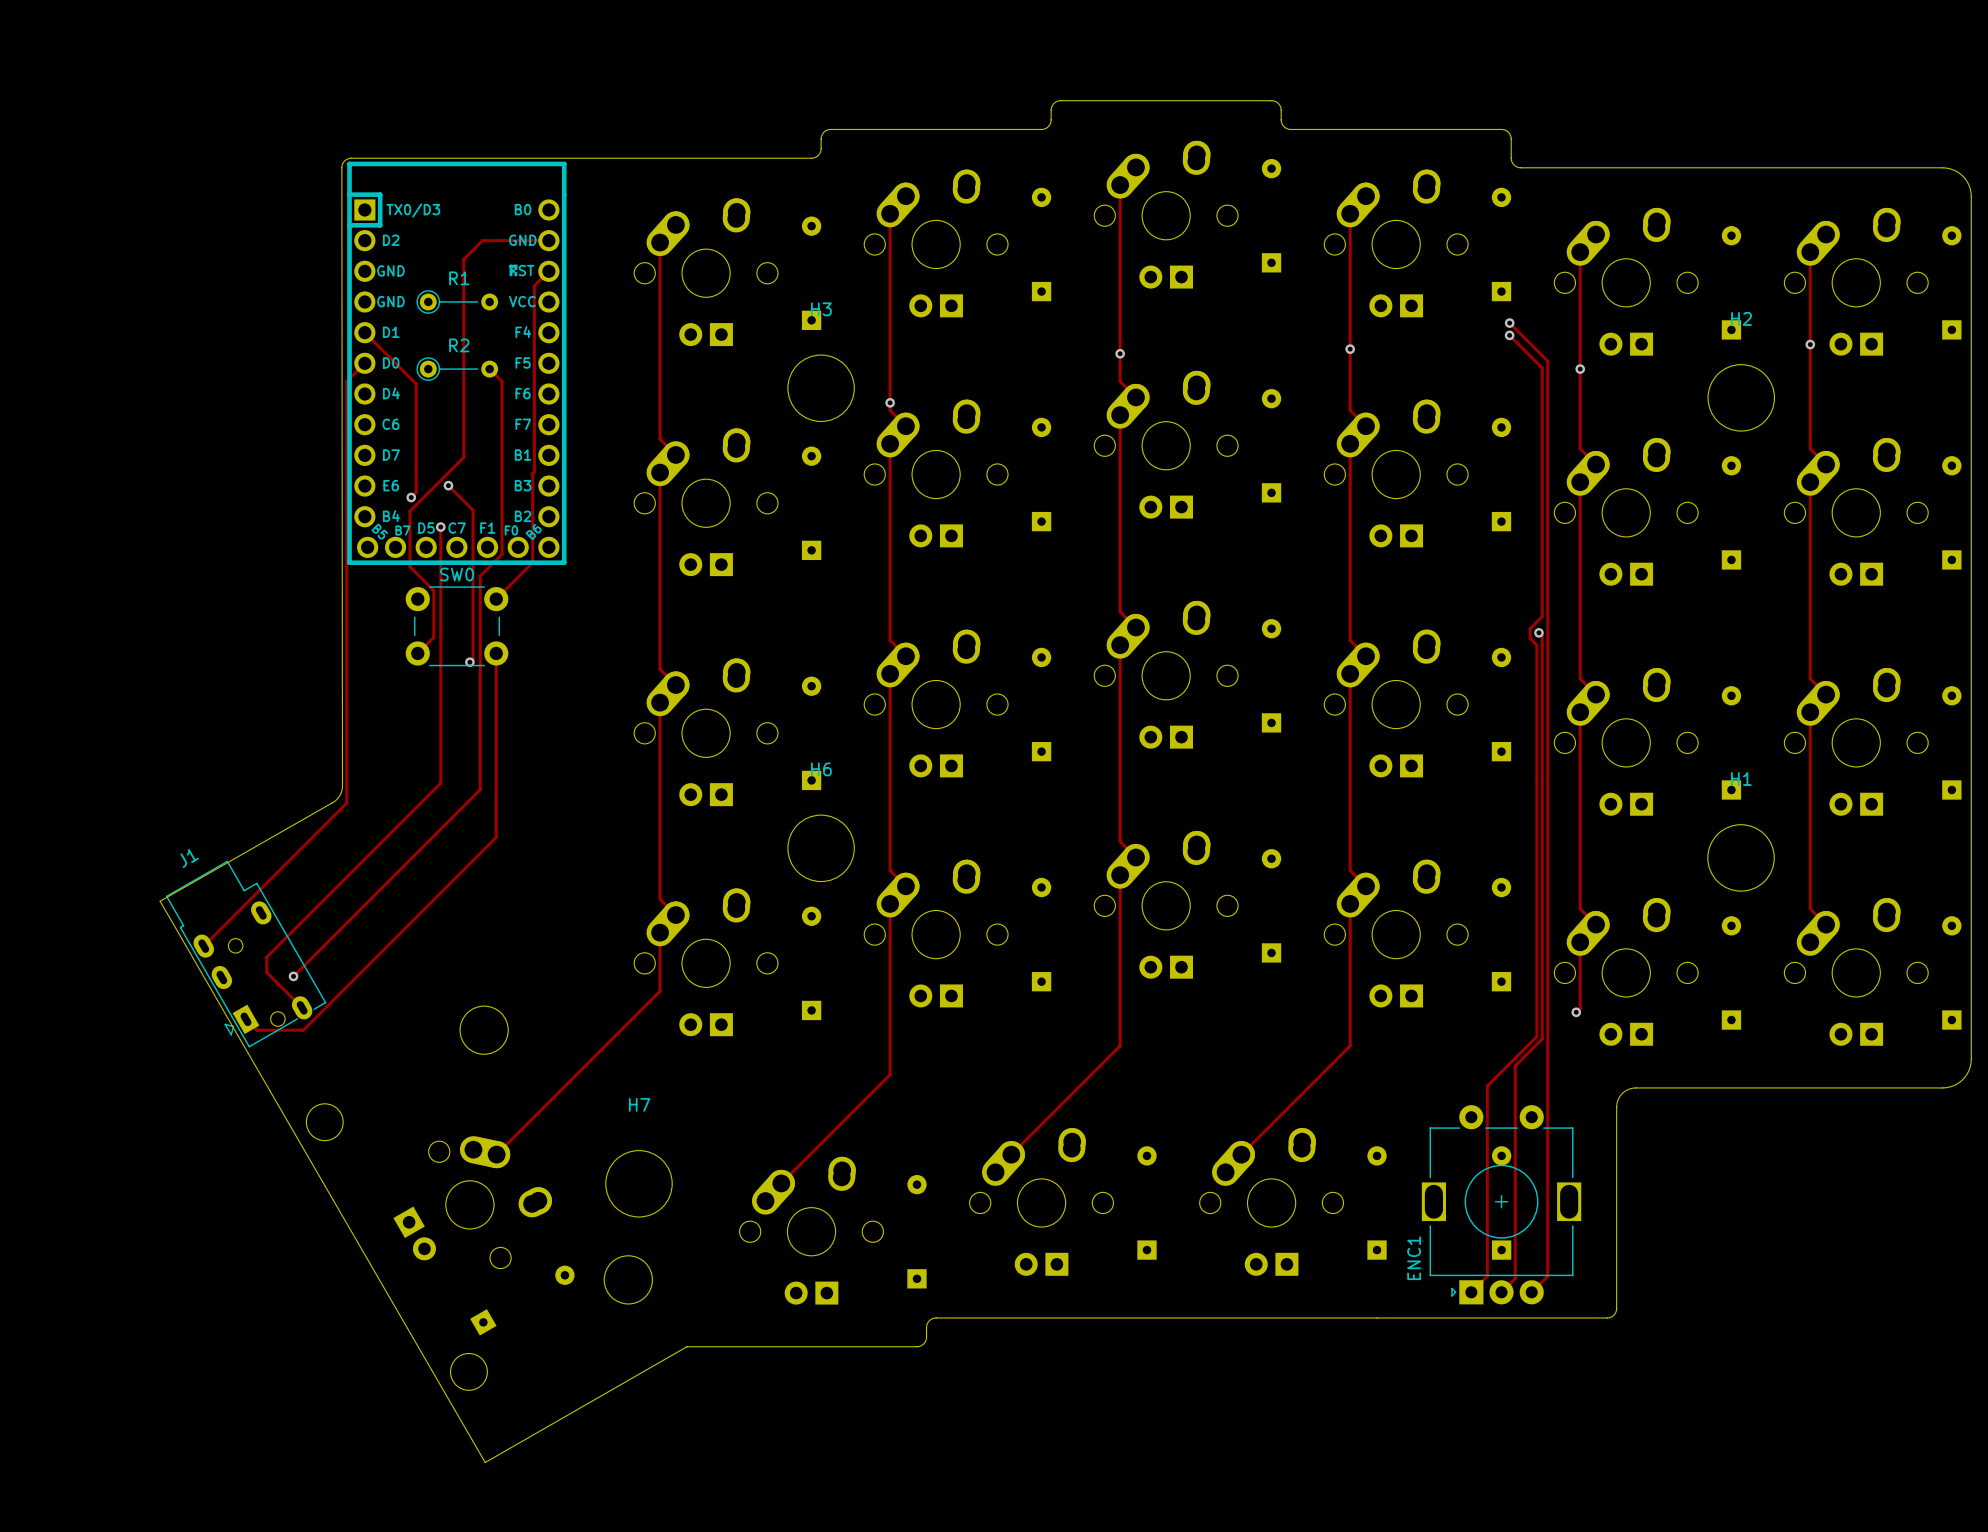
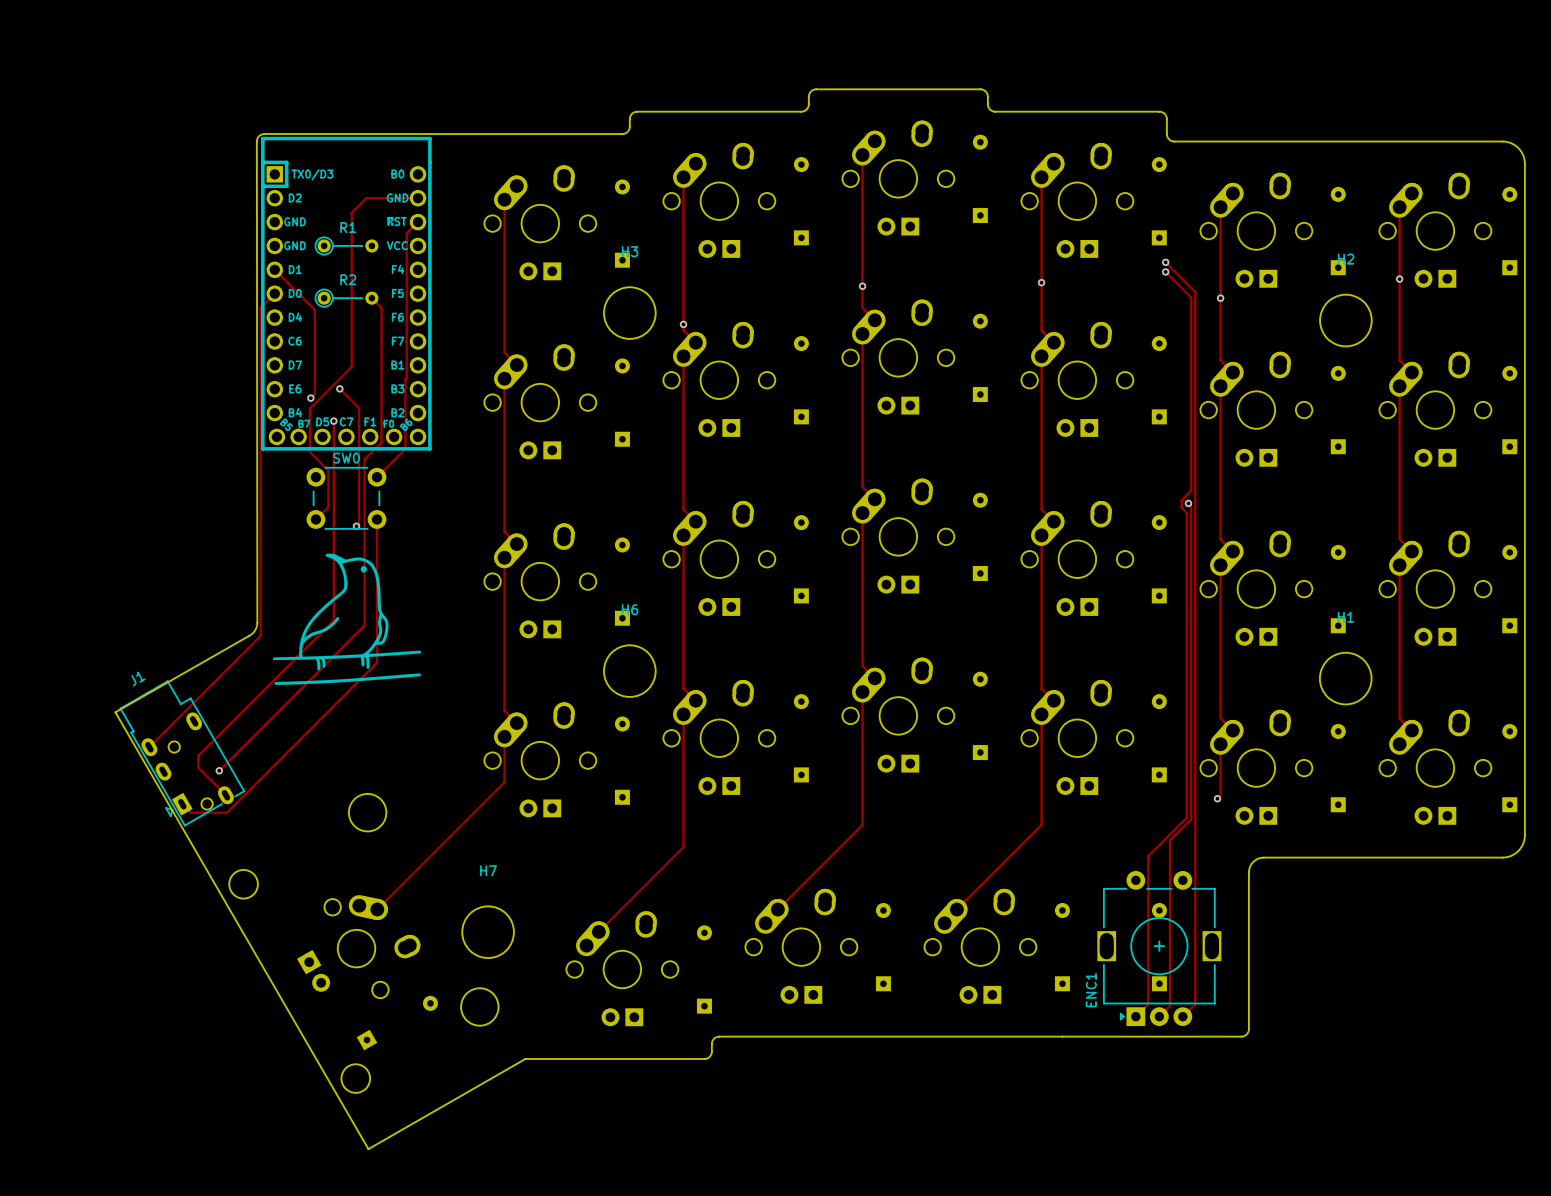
drawing: none -> [273, 553, 422, 685]

